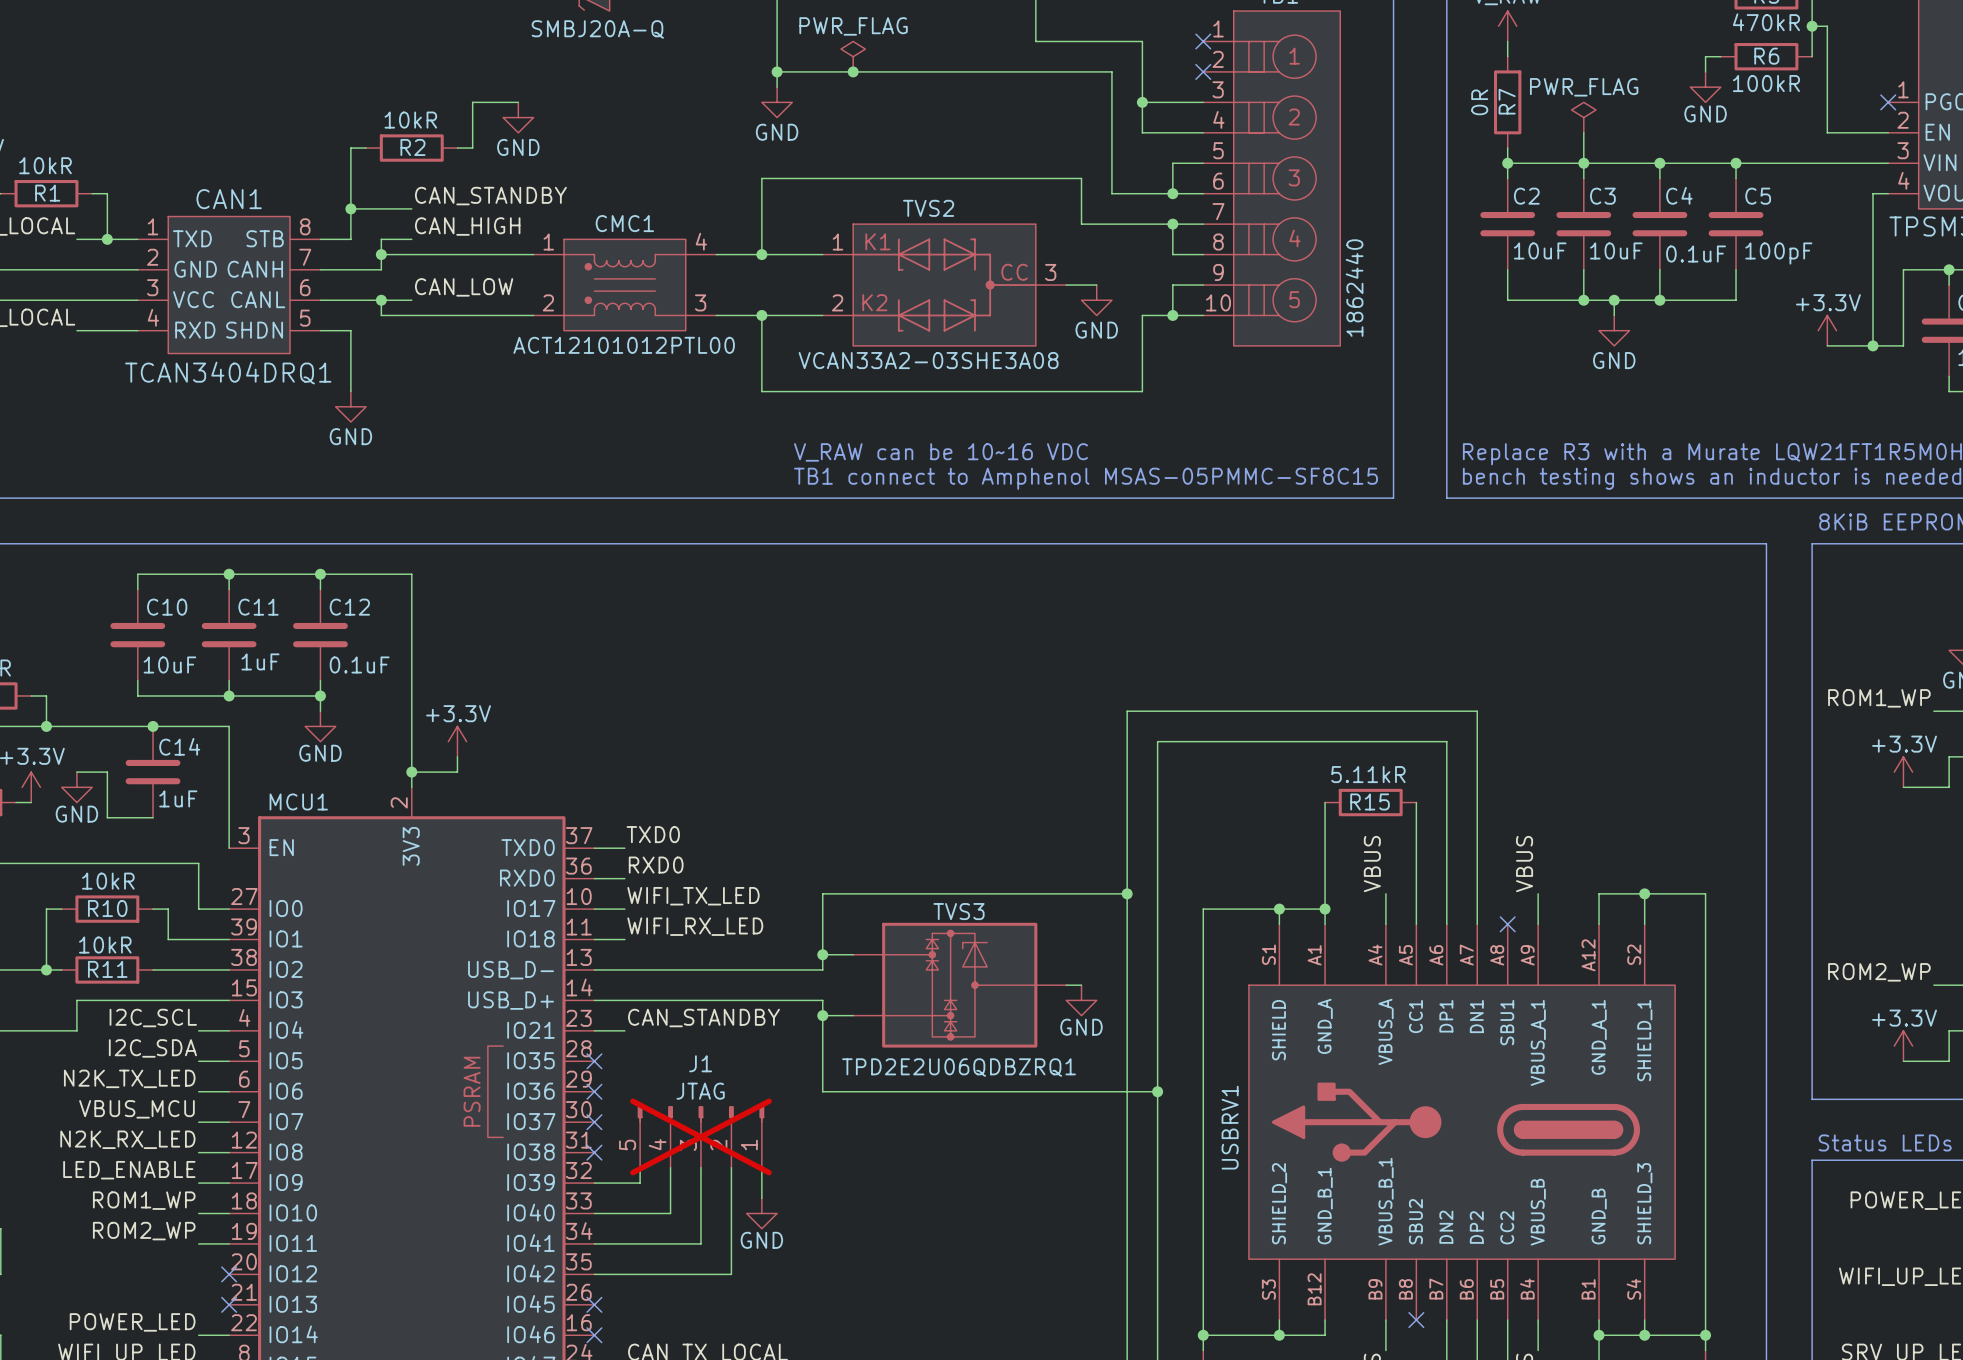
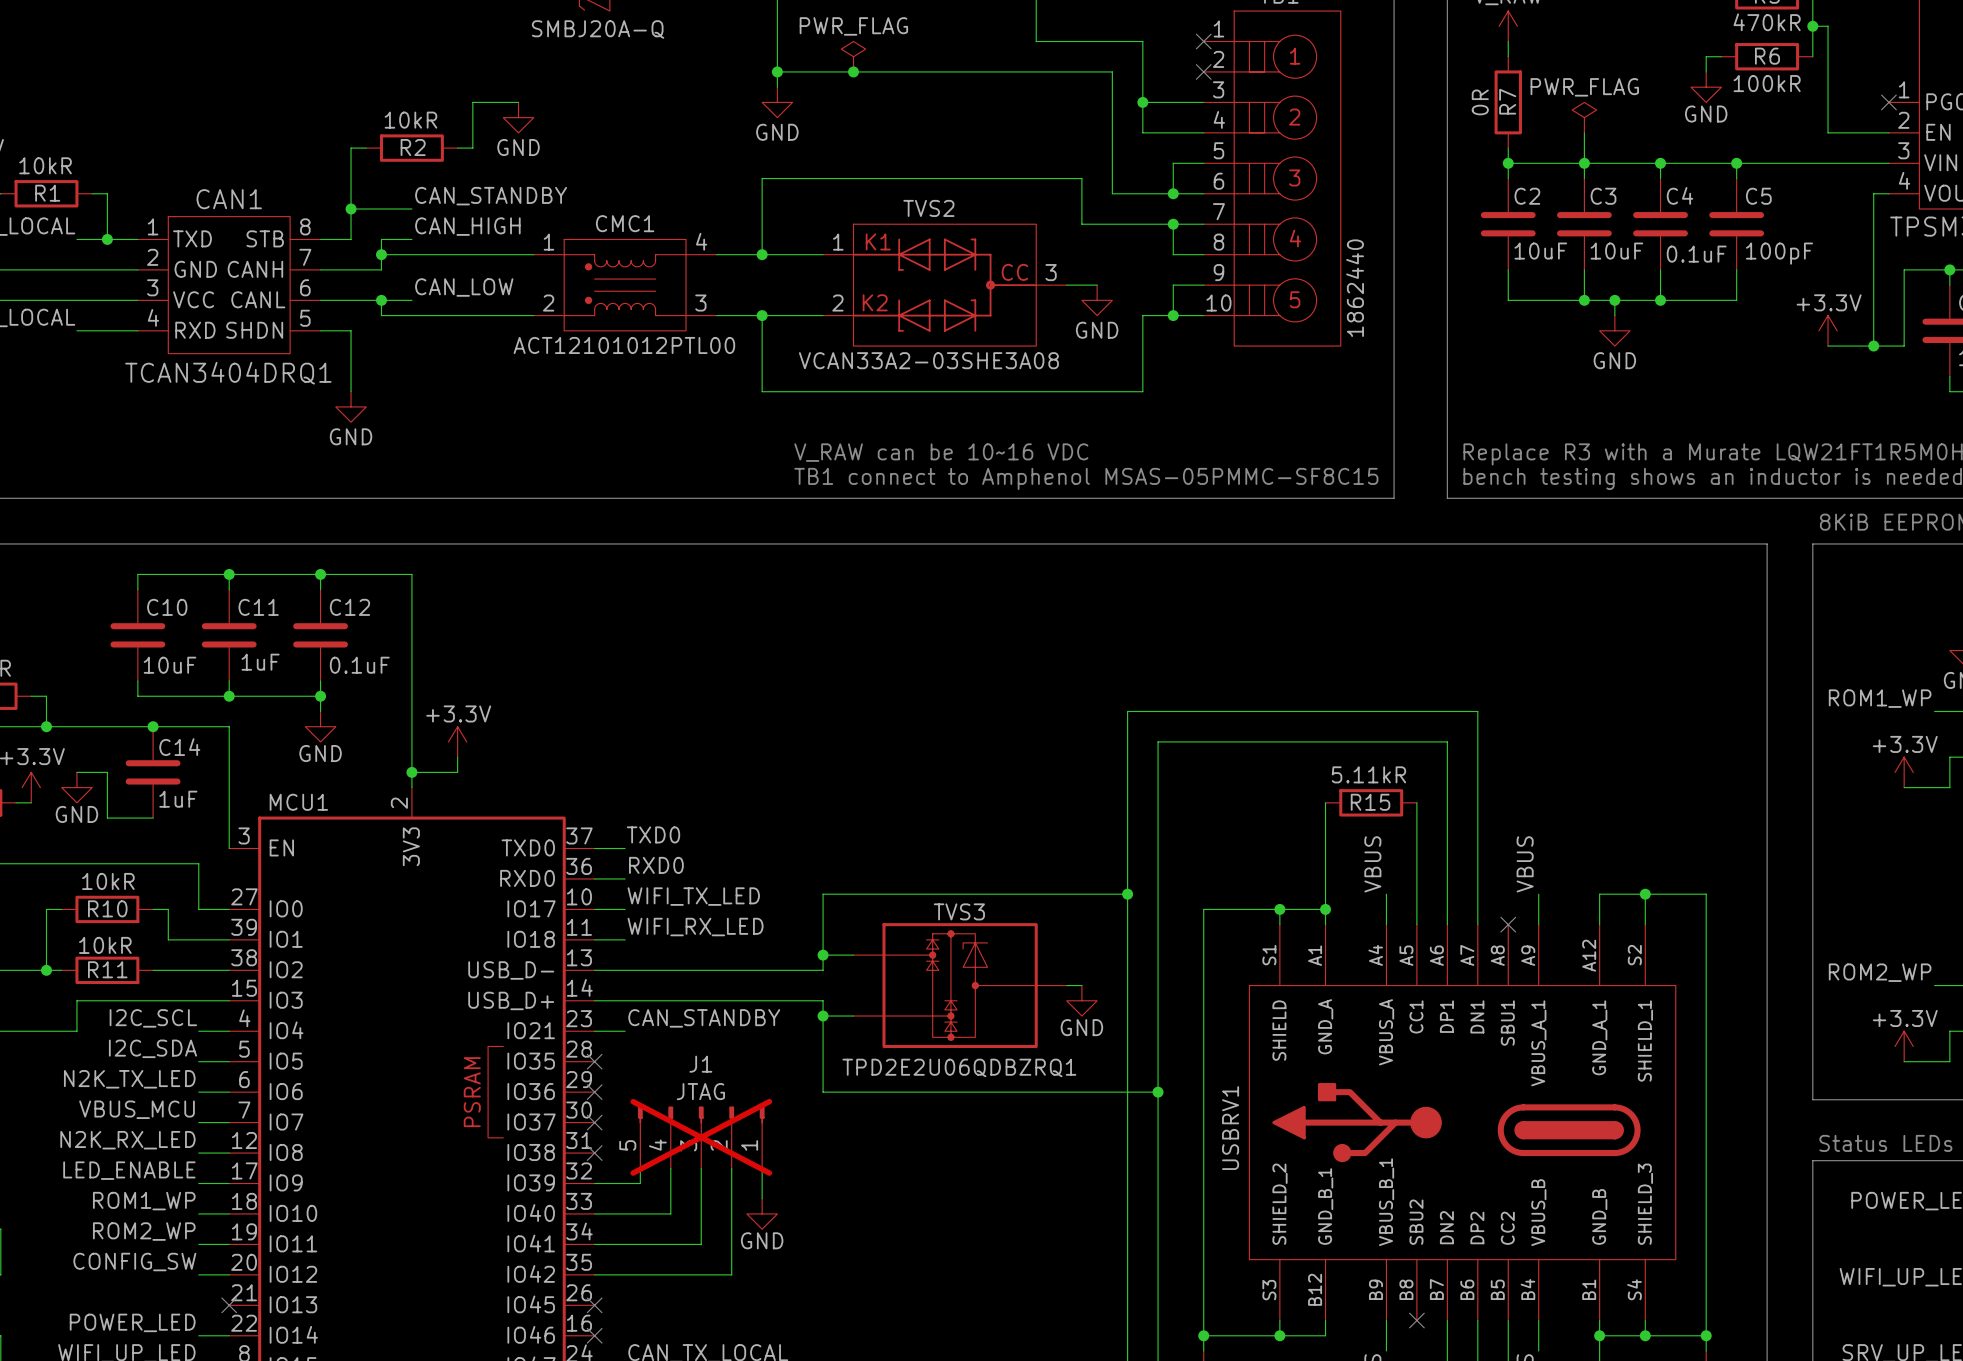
label: none -> CONFIG_SW (134, 1262)
wire: none -> (198, 1274) (229, 1274)
no-connect mark: (229, 1274) -> none

